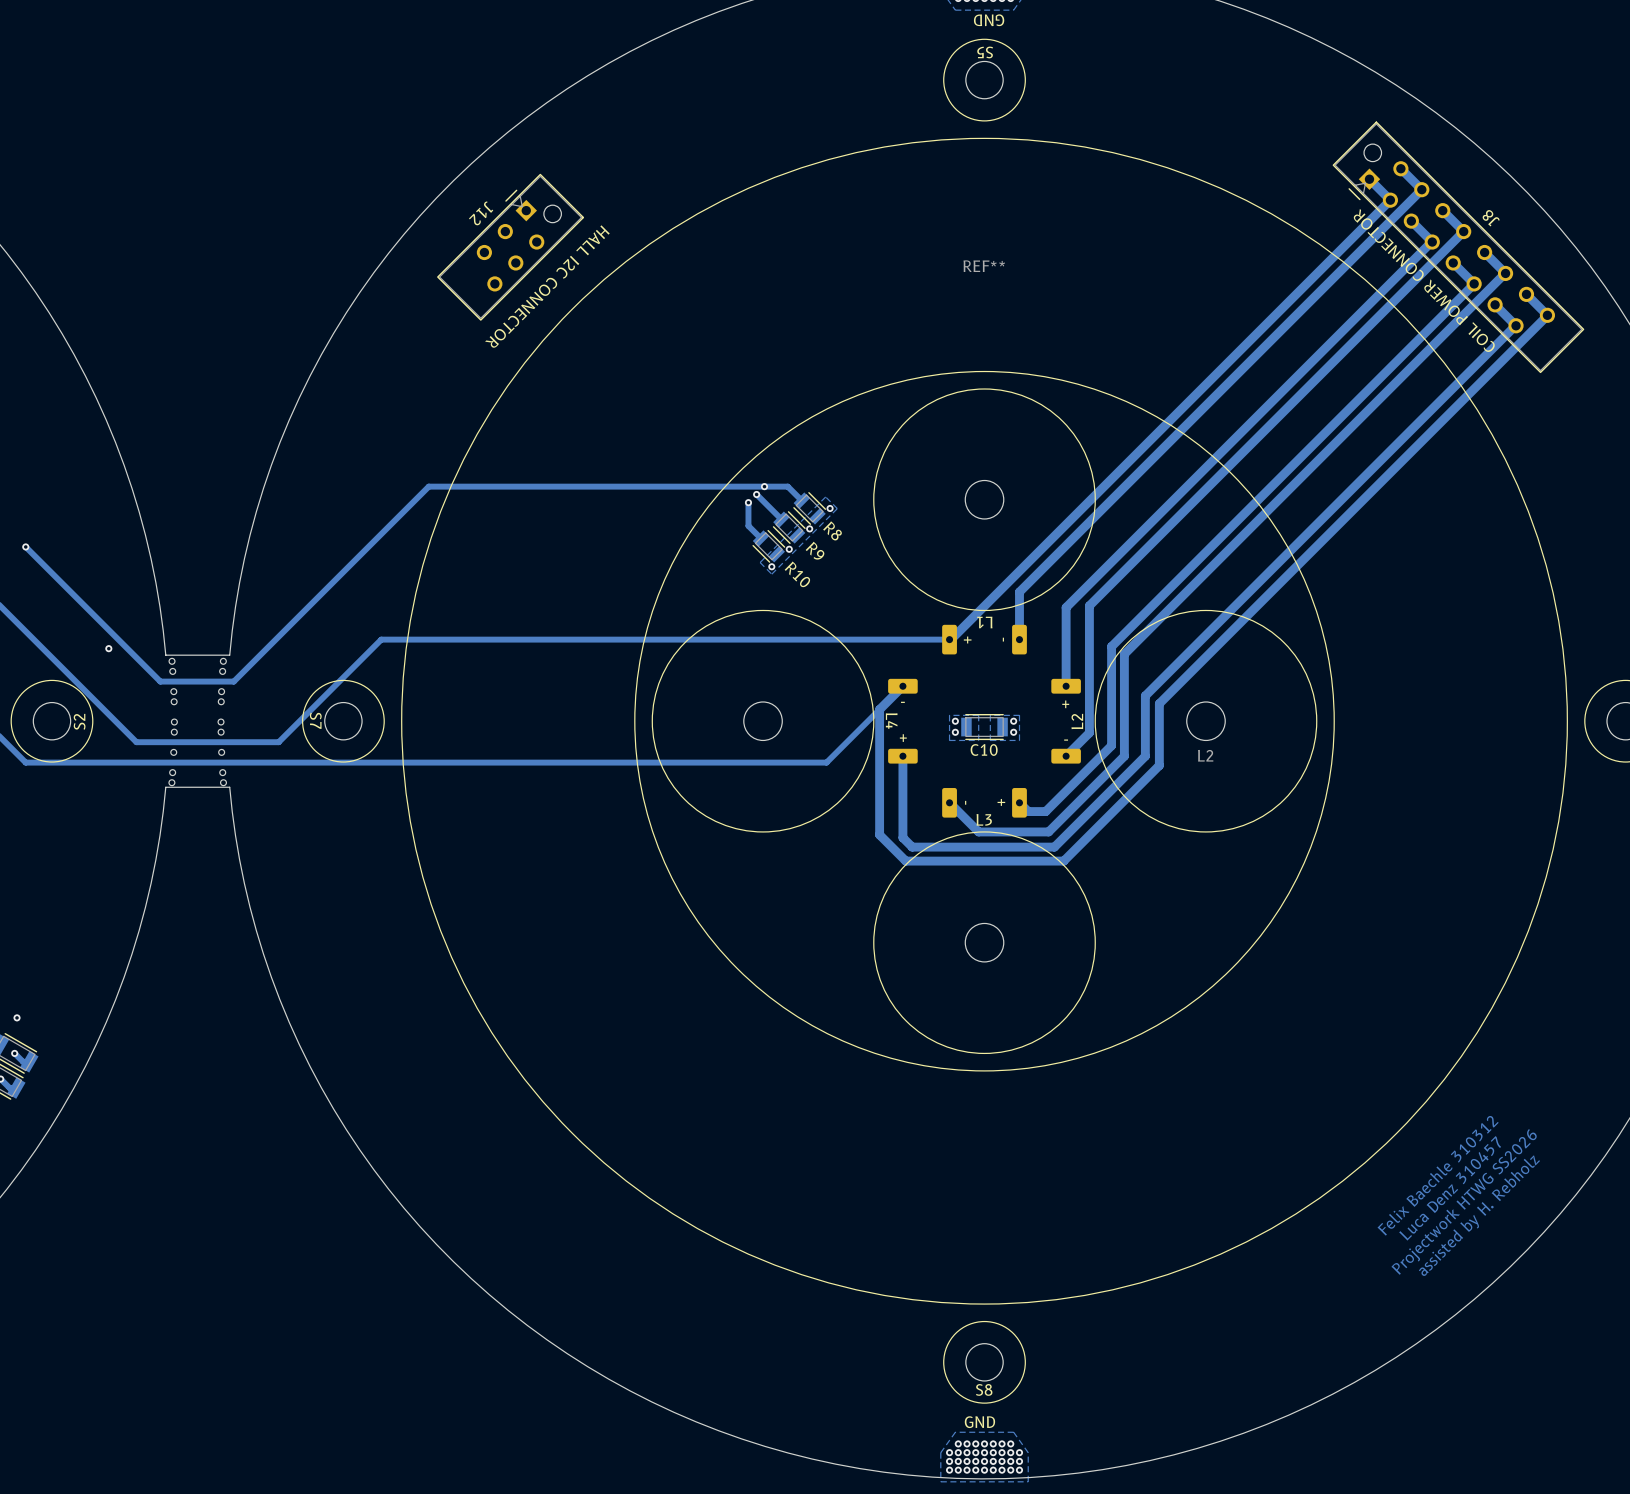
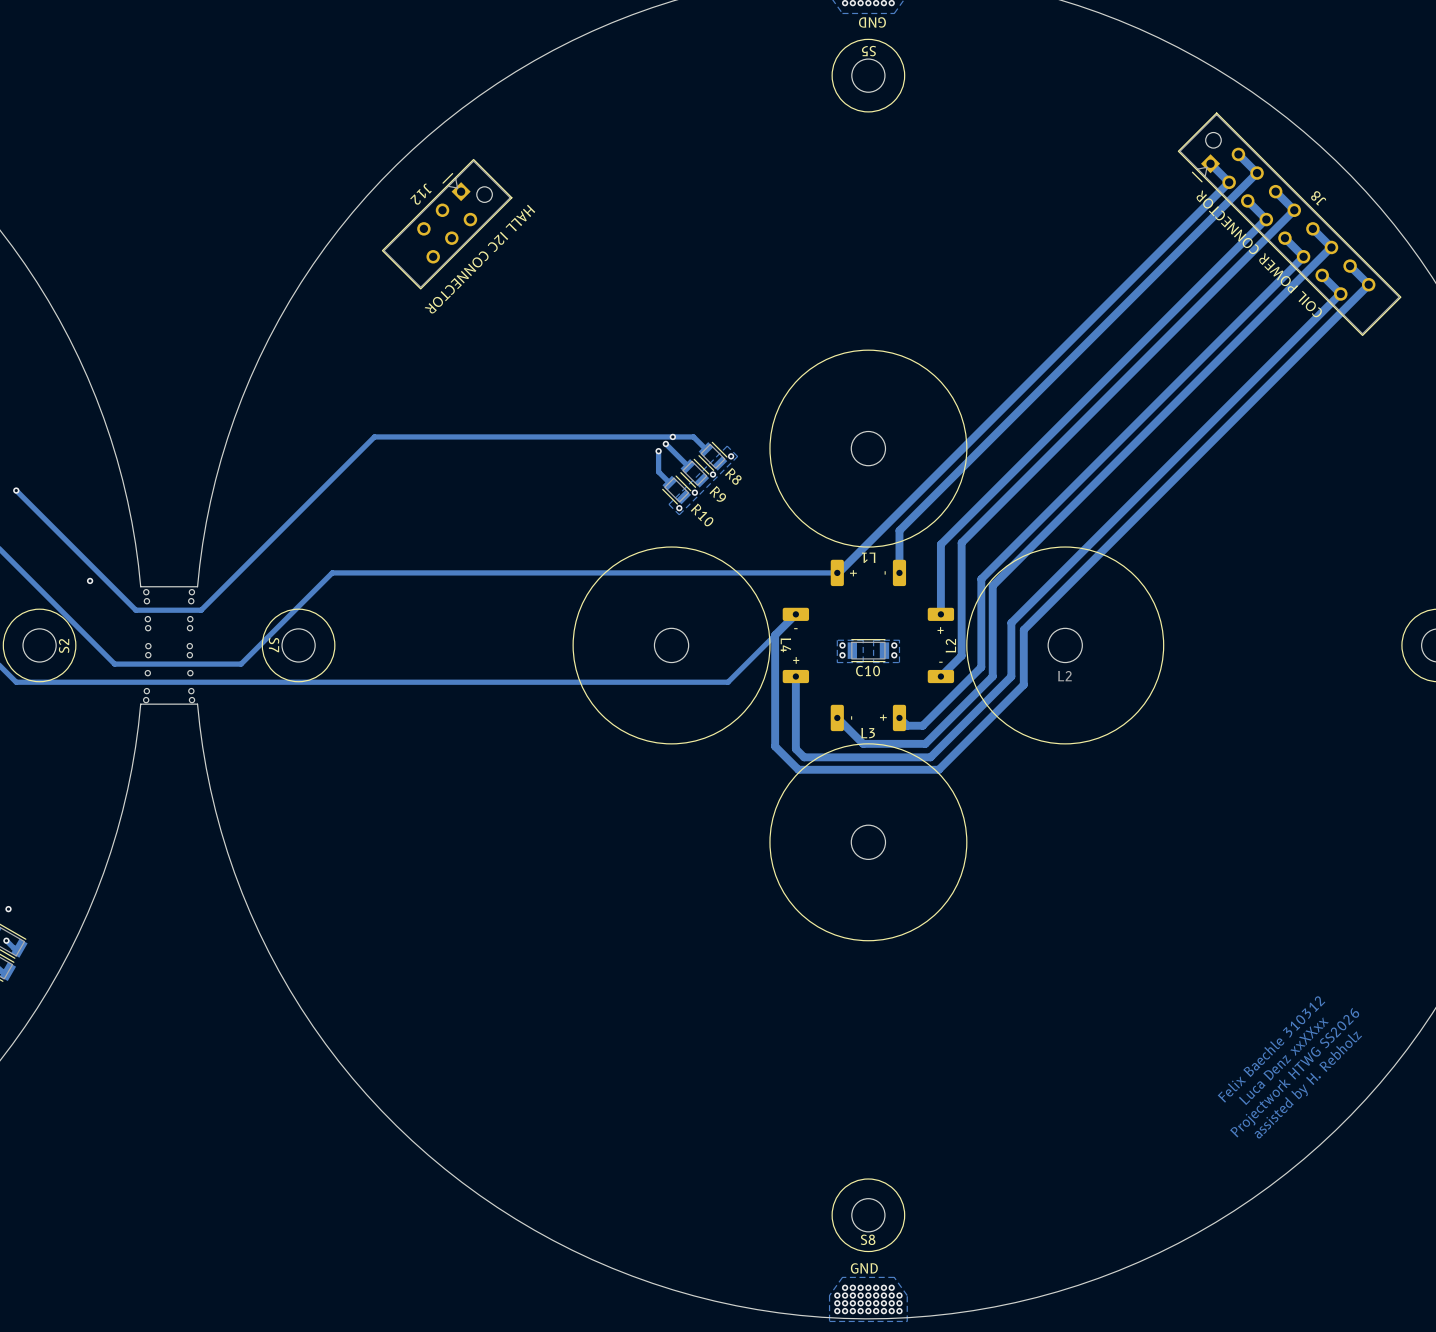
REF**: (984, 721) -> none
text: Luca Denz 310457 (1450, 1188) -> Luca Denz xxXXxx (1283, 1061)

